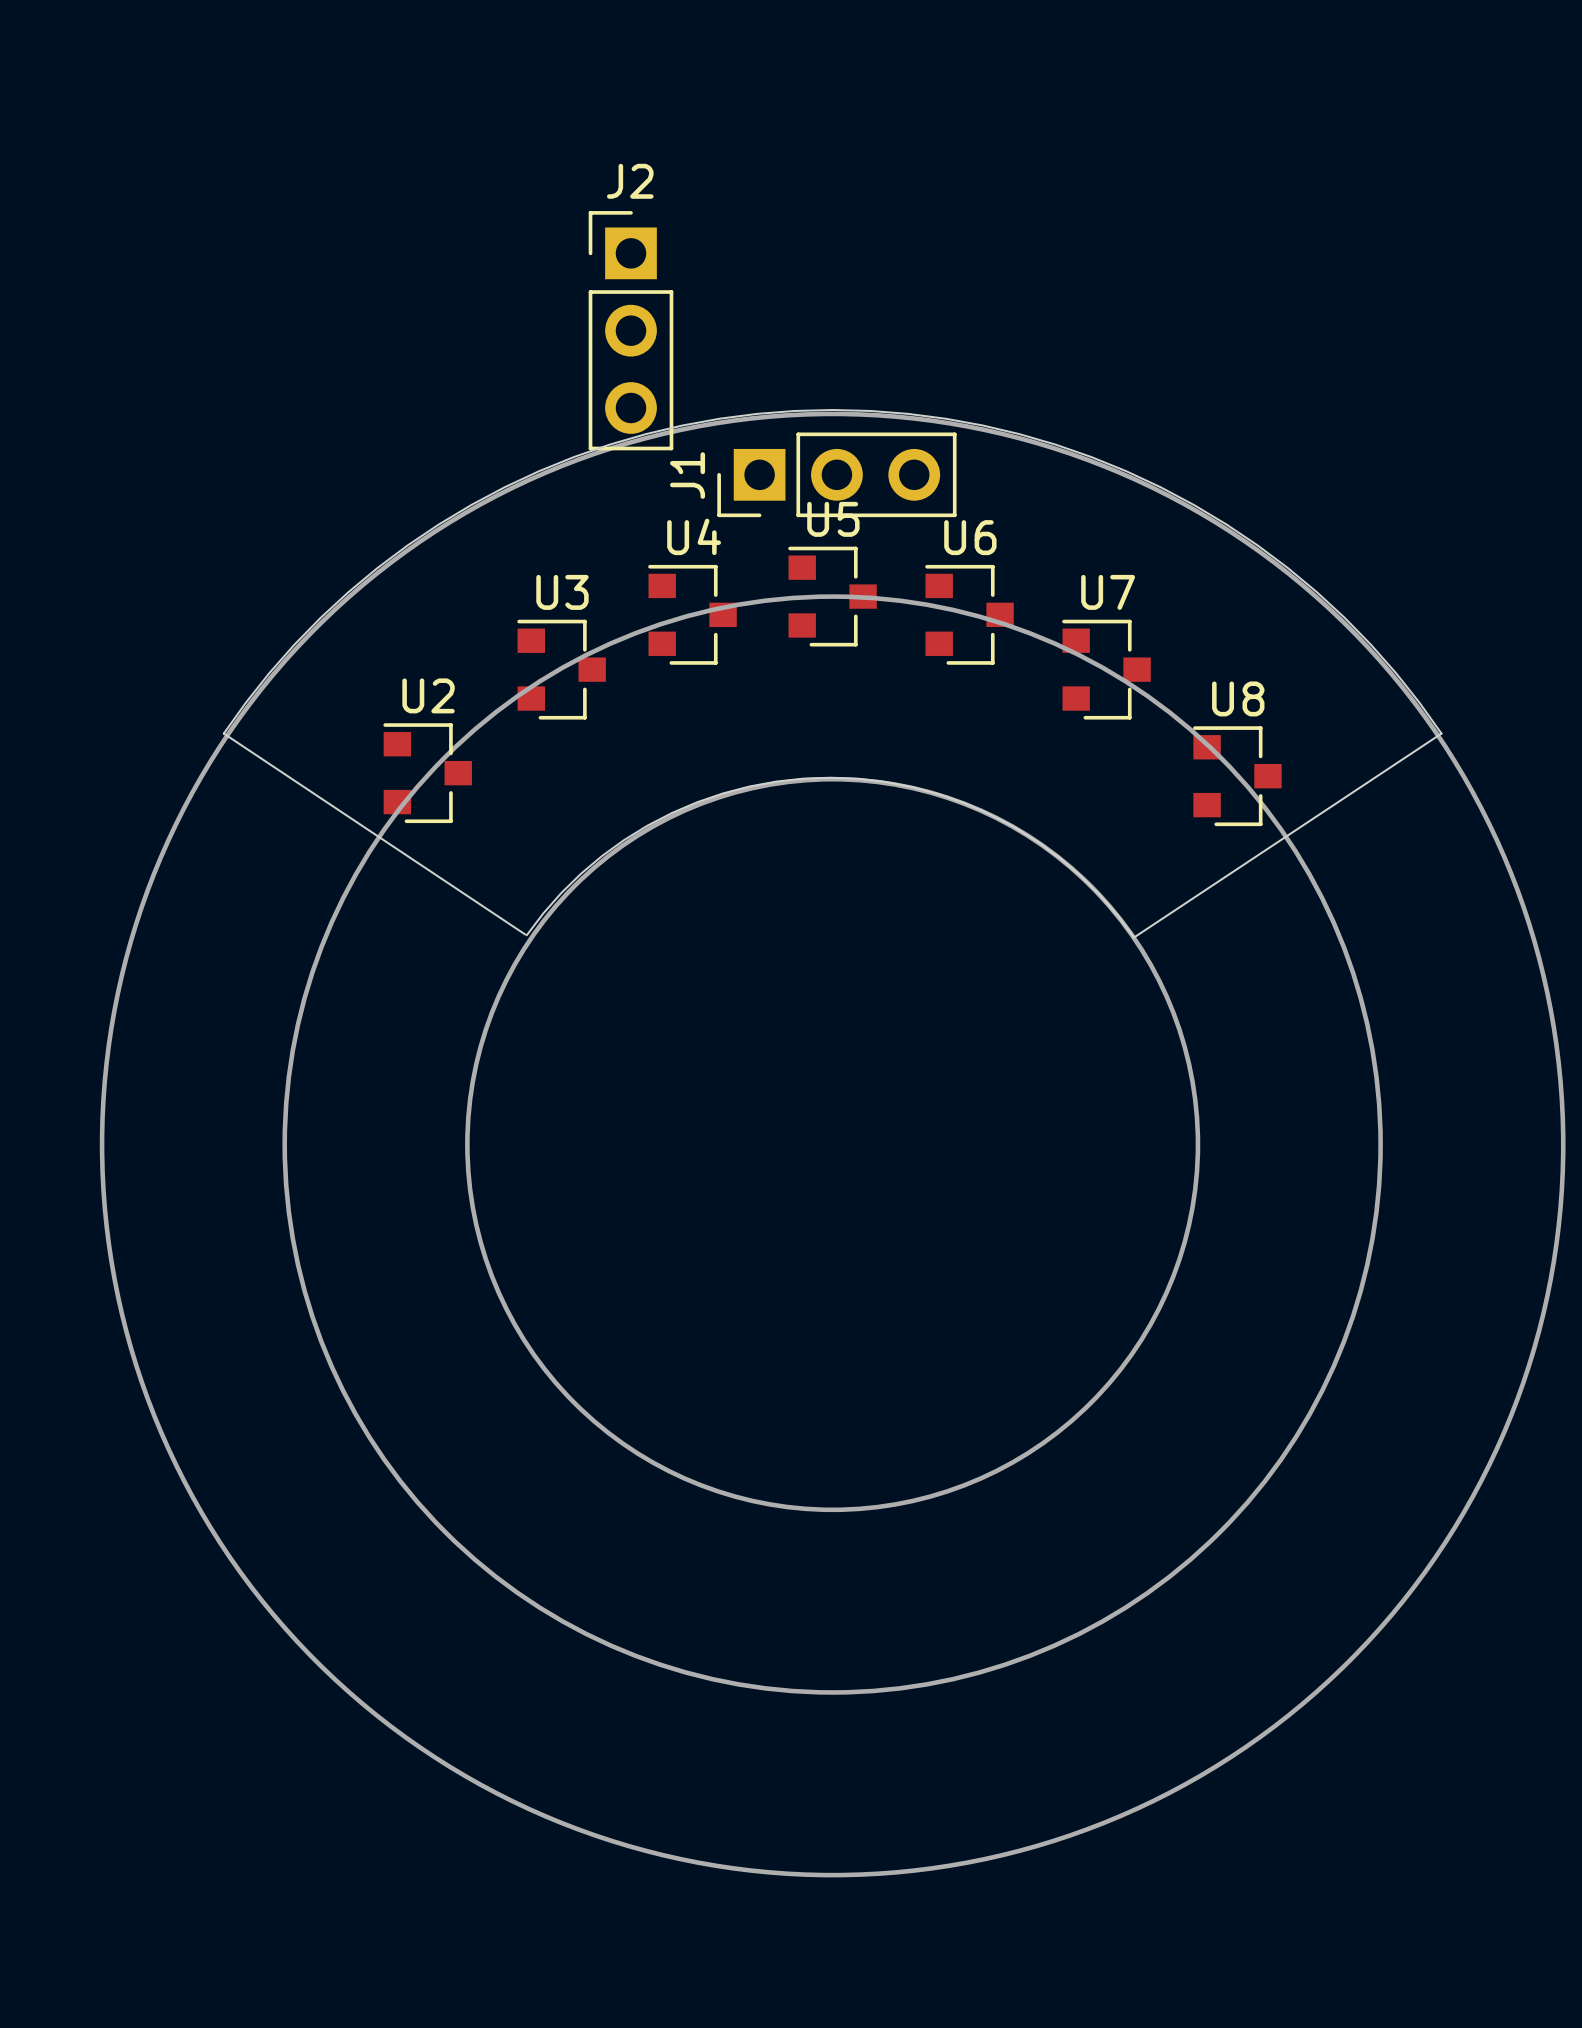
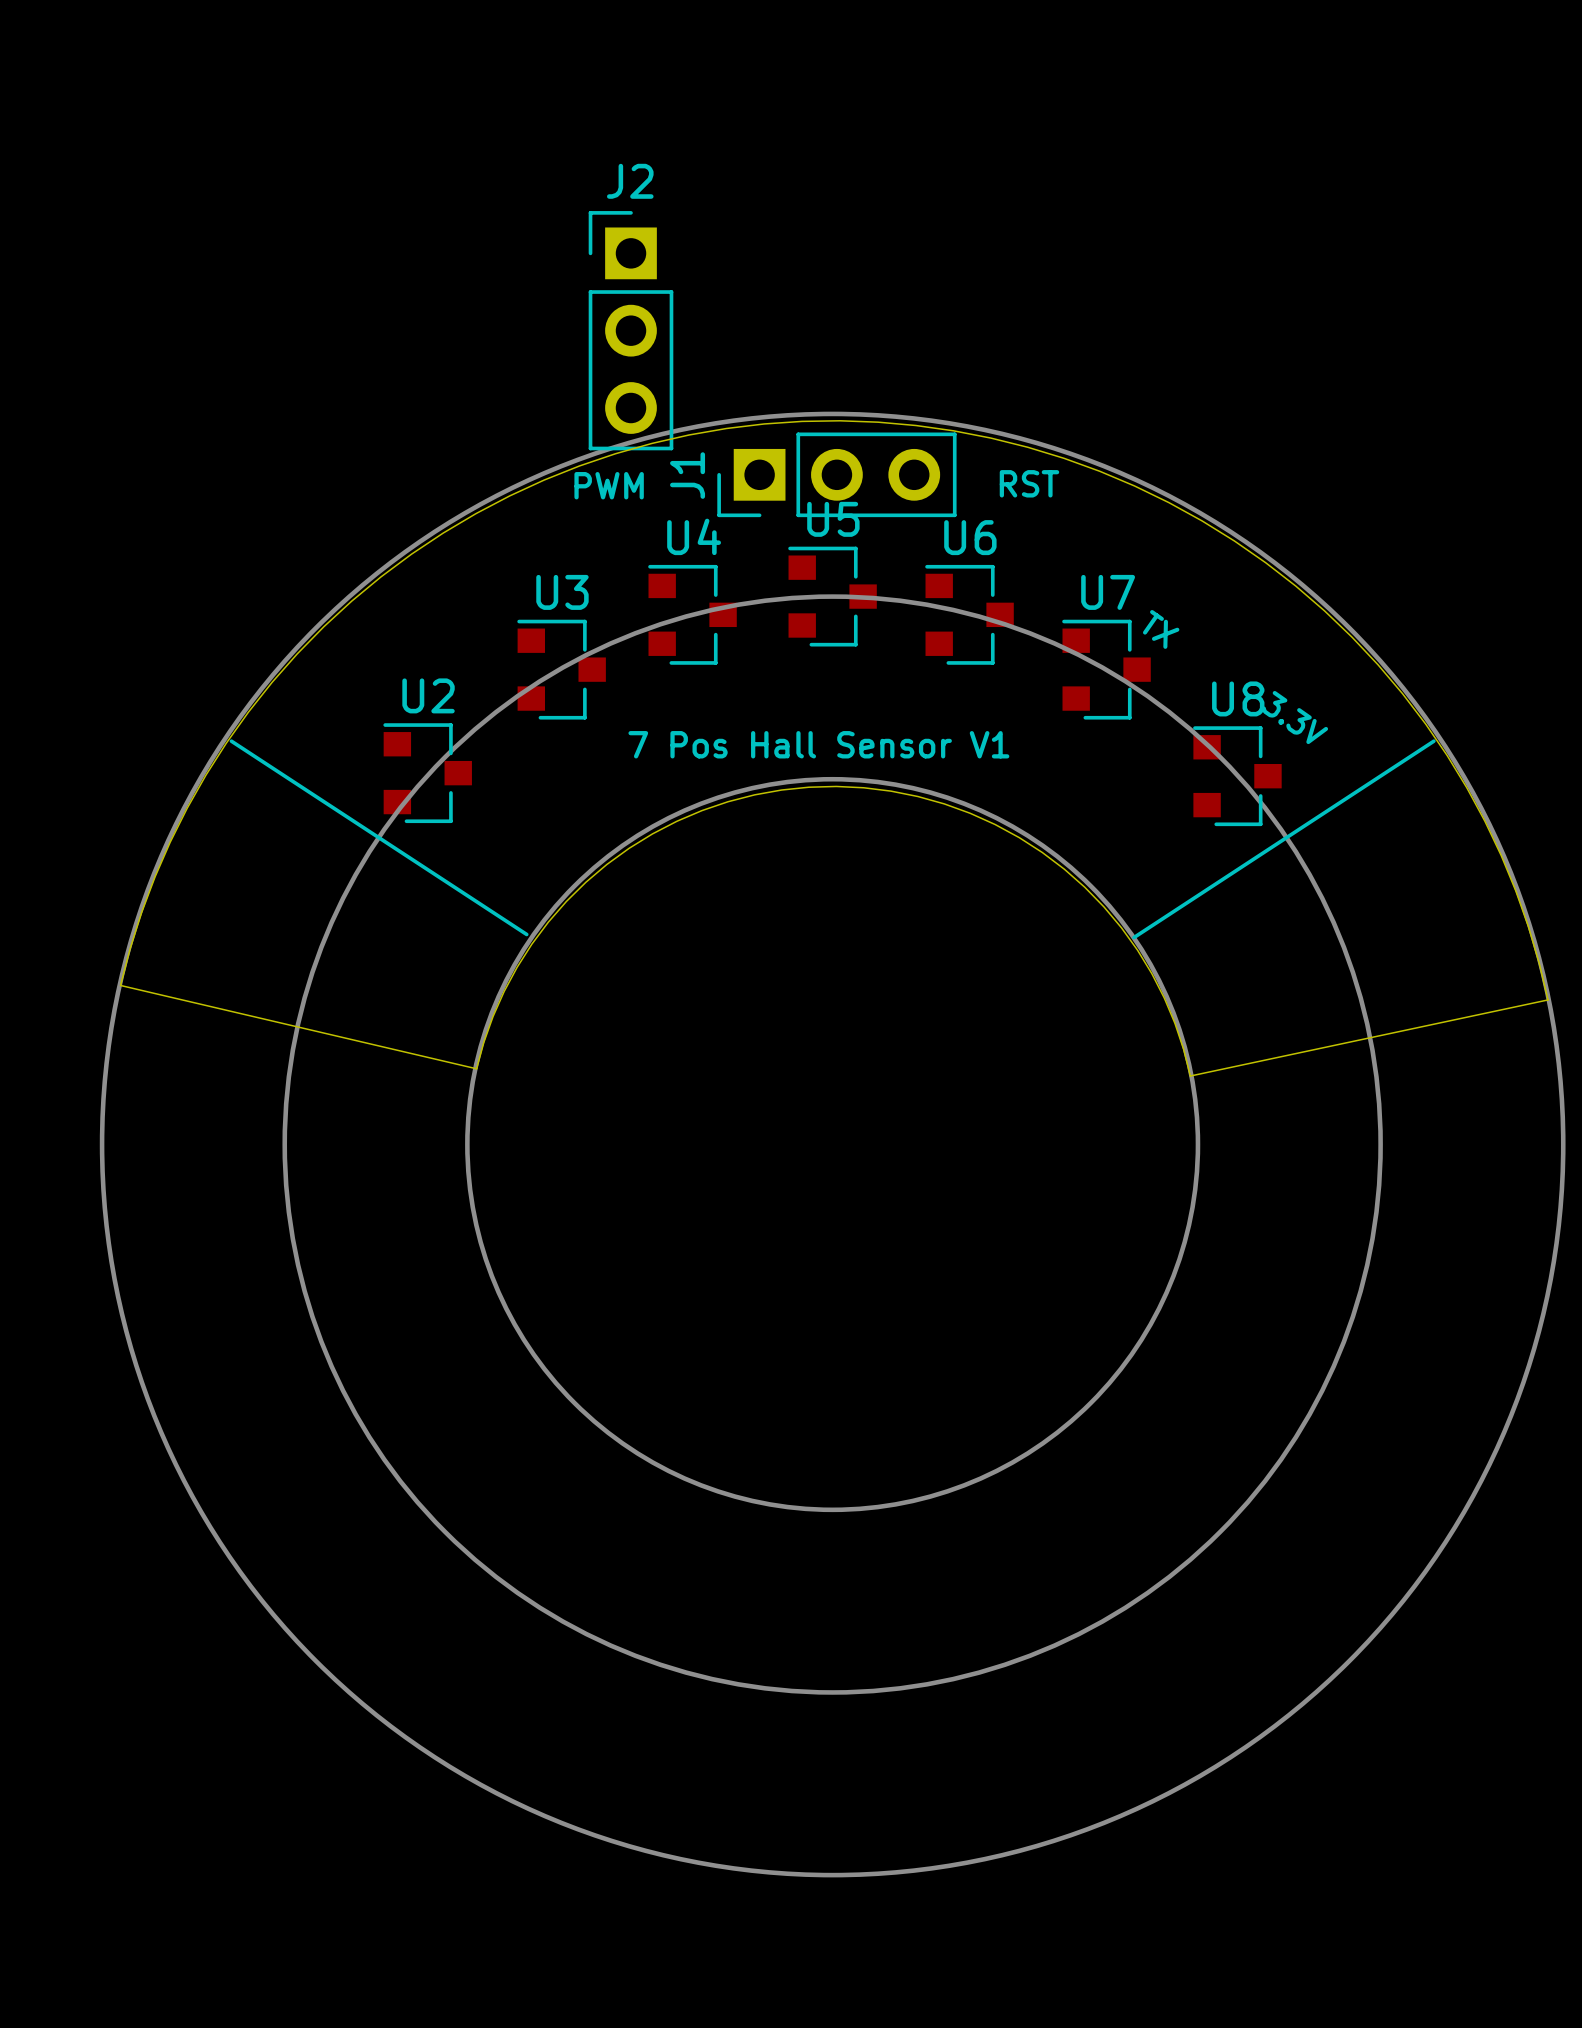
text: none -> RST (1029, 483)
text: none -> PWM (609, 485)
text: none -> TX (1161, 629)
text: none -> 3.3V (1294, 717)
line: none -> (231, 741) (526, 934)
line: none -> (1433, 741) (1134, 937)
text: none -> 7 Pos Hall Sensor V1 (818, 744)
board edge: (525, 934) (223, 733) (245, 702) (294, 644) (348, 592) (407, 545) (471, 504) (538, 471) (609, 444) (682, 425) (719, 418) (794, 410) (870, 410) (945, 418) (982, 425) (1019, 434) (1091, 457) (1126, 471) (1193, 504) (1226, 524) (1287, 568) (1316, 592) (1371, 644) (1396, 673) (1441, 733) (1134, 937) (1099, 894) (1059, 857) (1037, 841) (989, 814) (938, 794) (912, 787) (885, 781) (831, 777) (776, 781) (749, 786) (722, 793) (671, 813) (624, 840) (581, 873) (543, 913) (526, 935) -> none
board edge: none -> (120, 985) (476, 1068) (493, 1016) (517, 967) (548, 922) (585, 882) (606, 864) (652, 833) (702, 810) (754, 794) (808, 787) (836, 786) (891, 791) (917, 796) (970, 813) (1019, 837) (1064, 869) (1103, 906) (1137, 950) (1164, 998) (1174, 1023) (1190, 1076) (1548, 999) (1539, 962) (1515, 890) (1484, 821) (1447, 755) (1402, 693) (1378, 664) (1324, 610) (1295, 586) (1265, 562) (1202, 521) (1134, 486) (1099, 471) (1027, 447) (990, 438) (915, 425) (840, 420) (764, 423) (689, 435) (615, 453) (579, 466) (509, 495) (475, 513) (443, 533) (381, 576) (323, 626) (297, 653) (248, 712) (205, 775) (187, 808) (155, 876) (141, 912) (120, 985)

